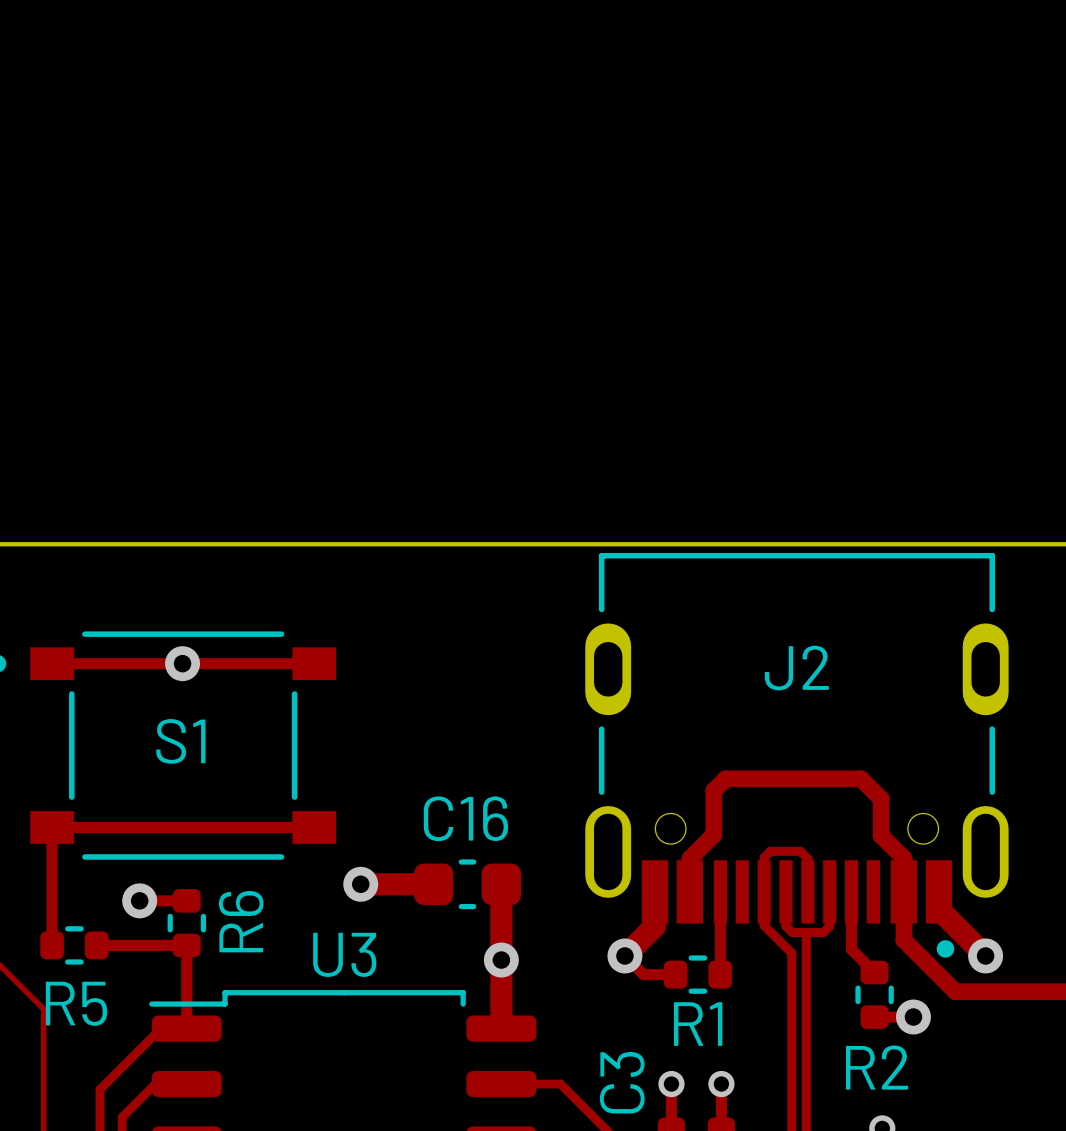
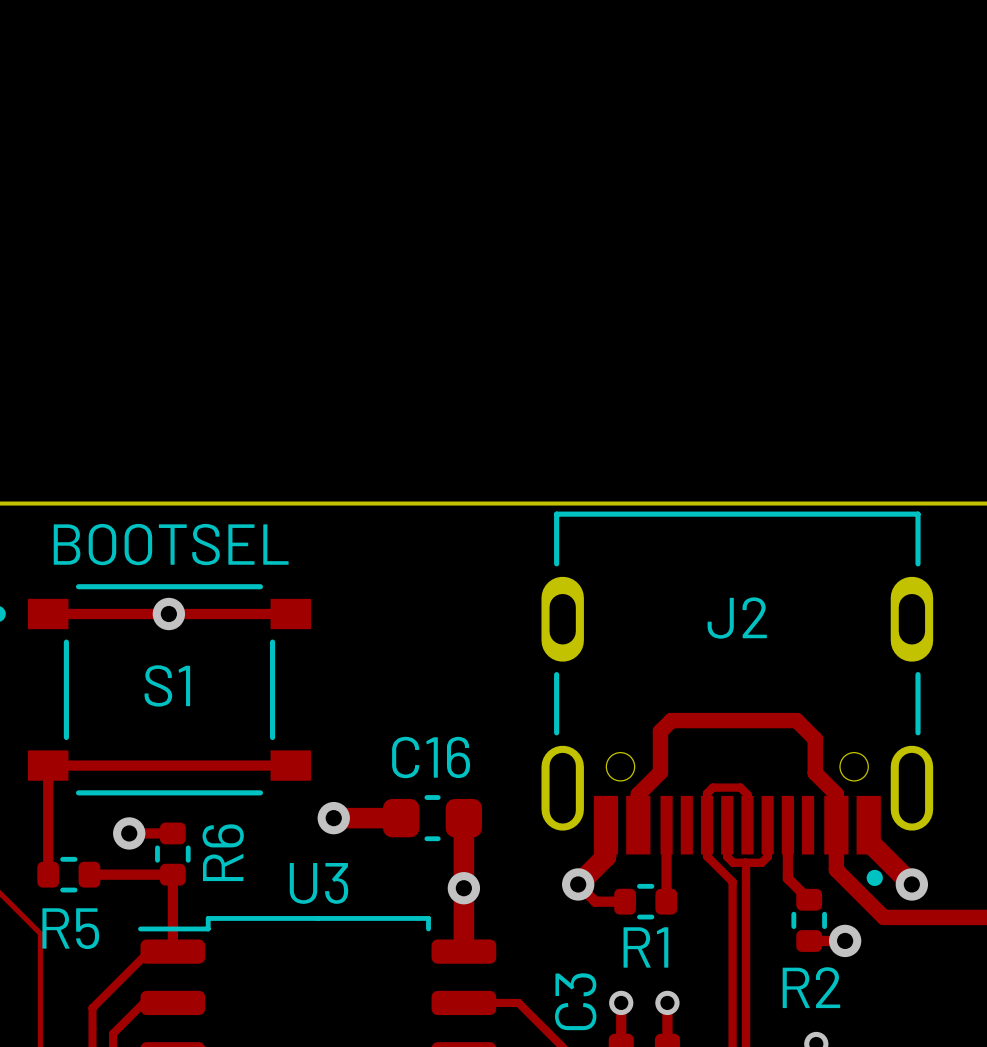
text: none -> BOOTSEL (171, 544)

